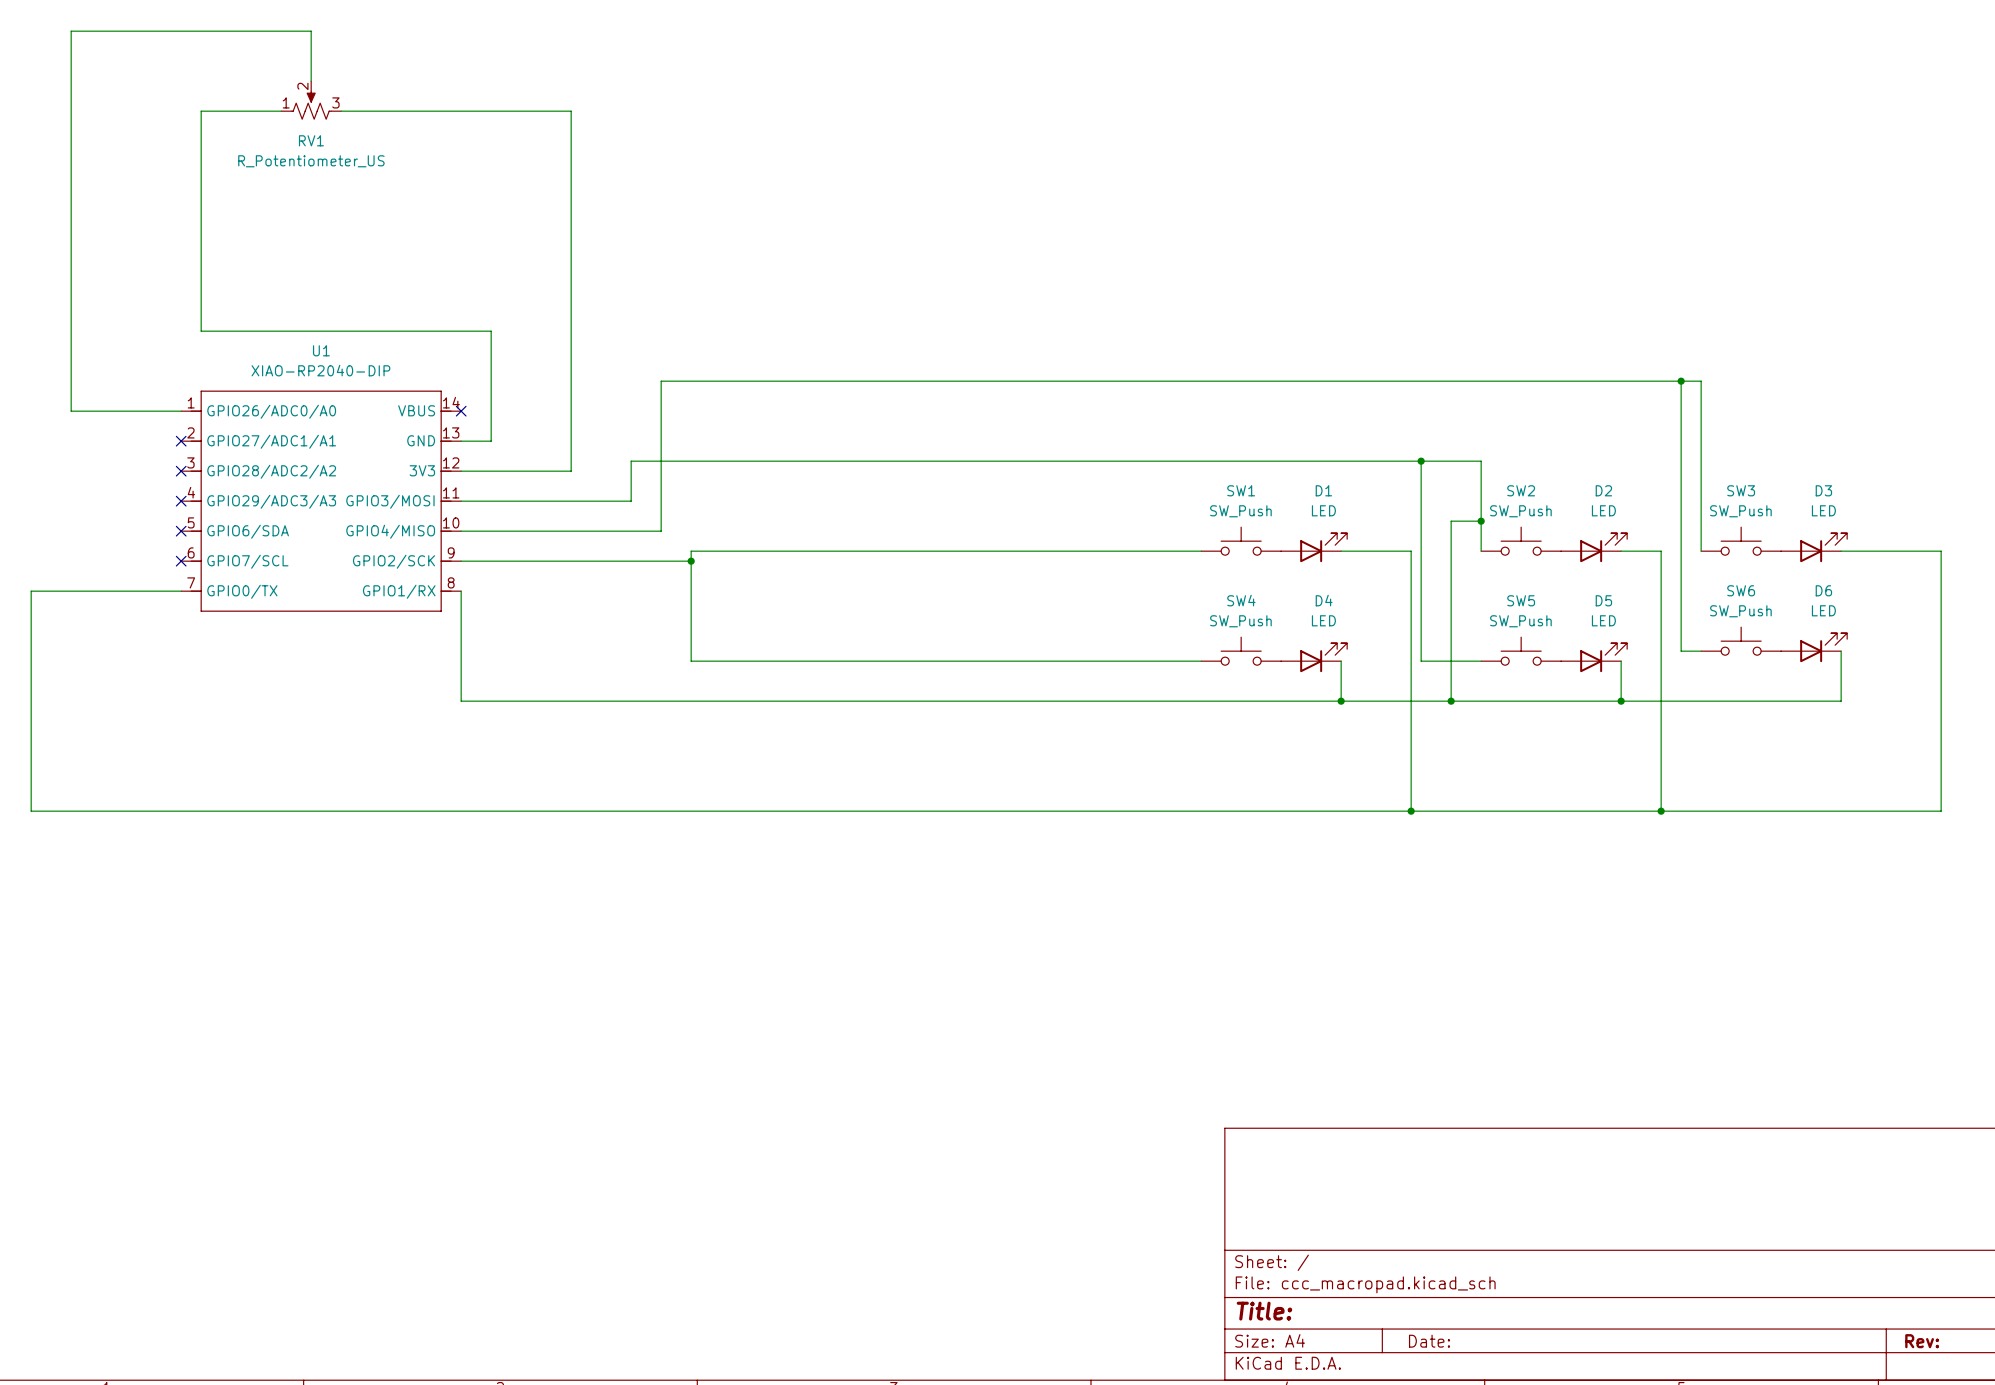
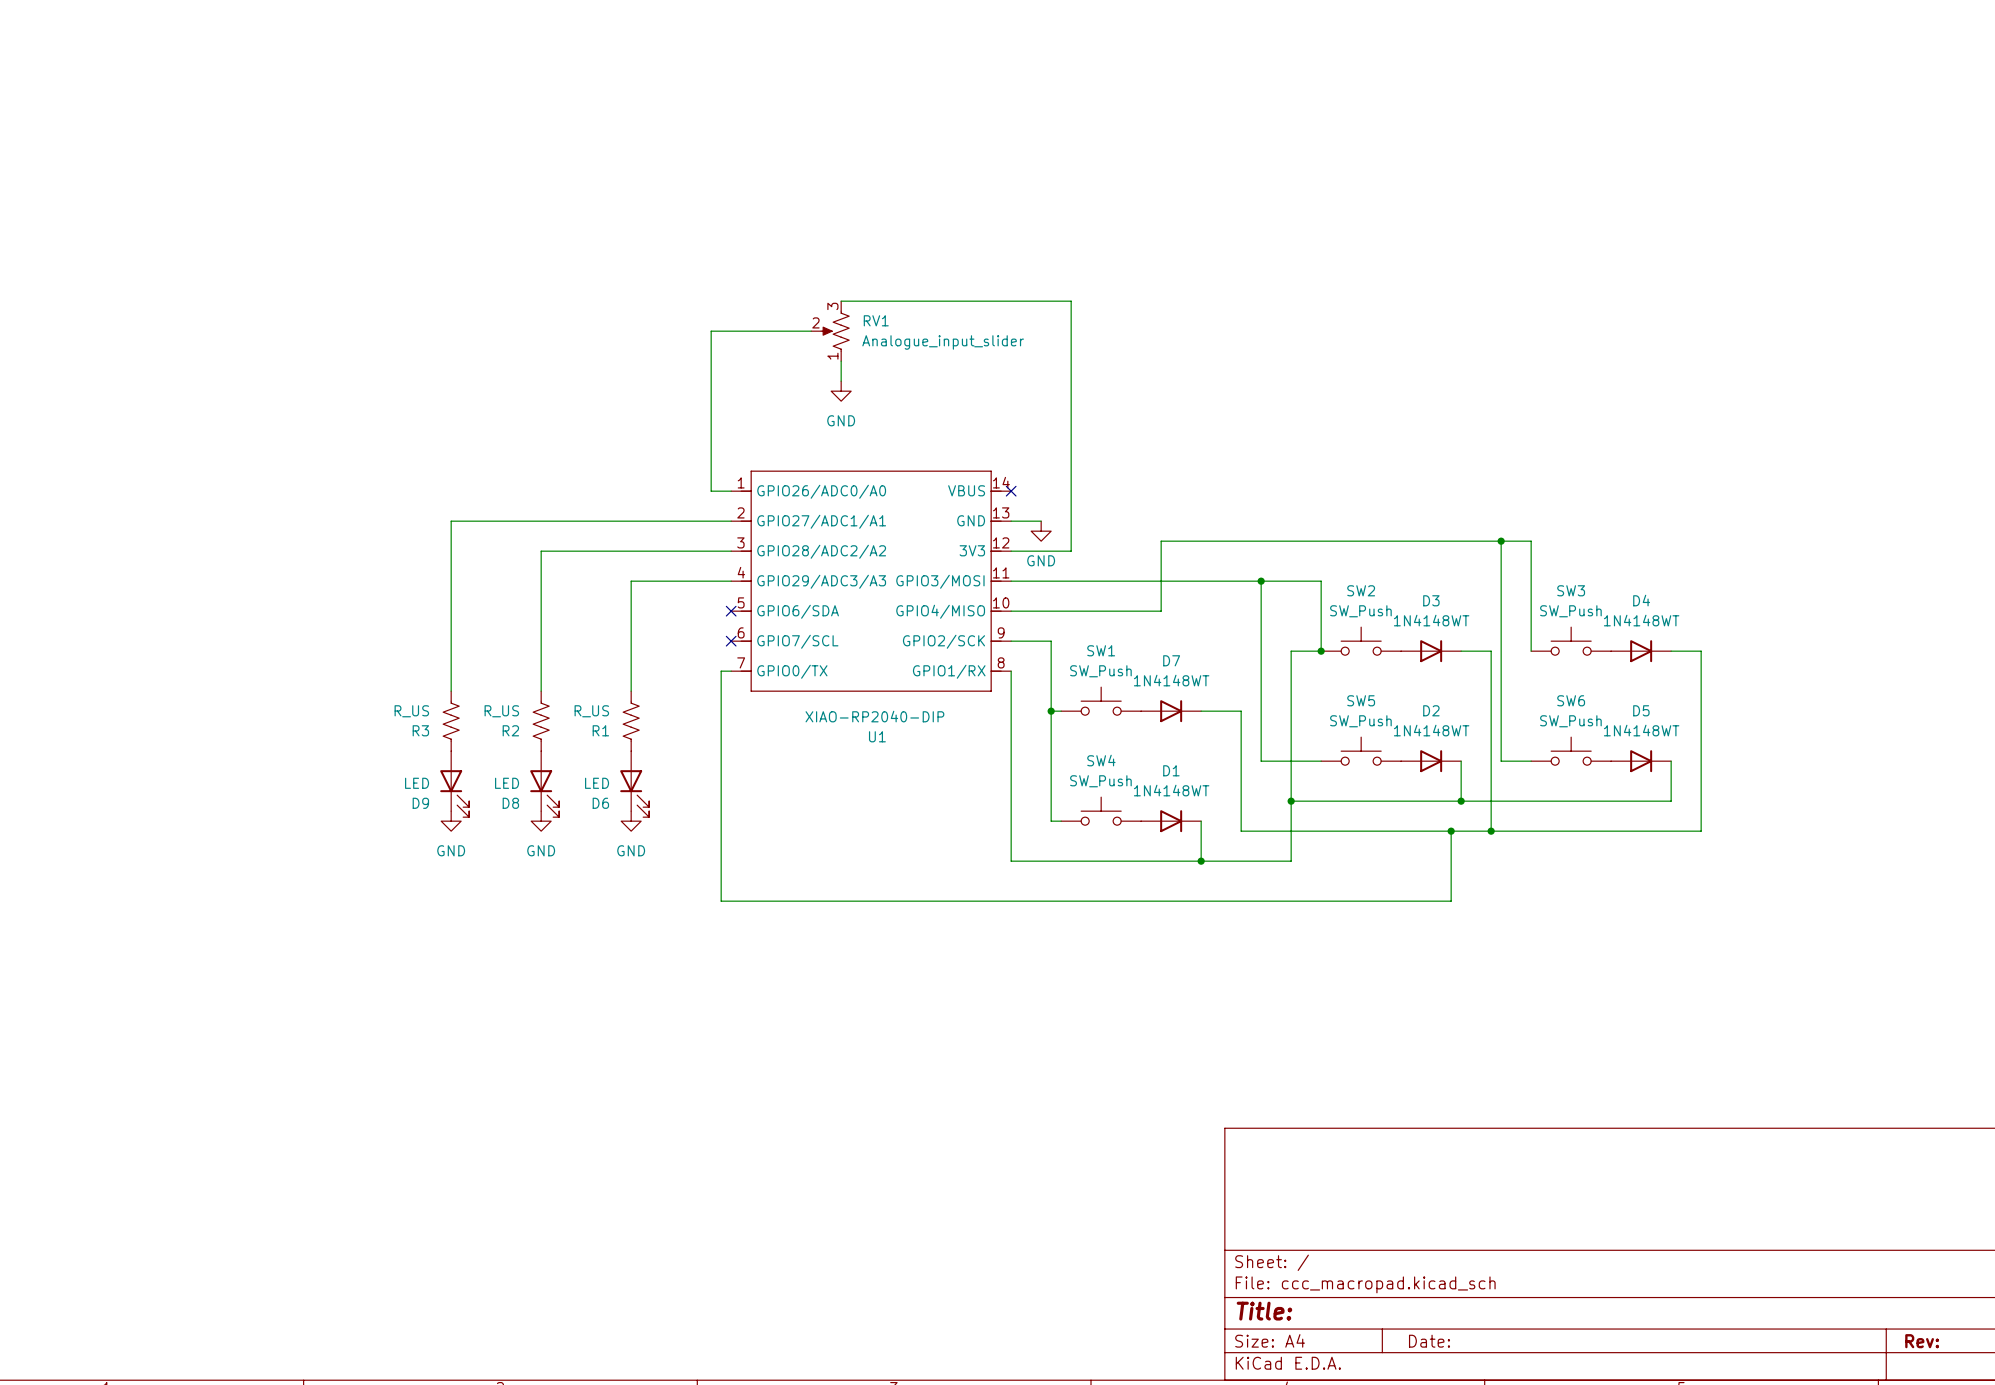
wire: (311, 81) (311, 31) (71, 31) (71, 411) (181, 411) -> none
RV1 position: (311, 100) -> (830, 331)
RV1 rotation: 0° (311, 105) -> 90° counterclockwise (835, 331)
wire: (281, 111) (201, 111) (201, 331) (491, 331) (491, 441) (461, 441) -> none
wire: (341, 111) (571, 111) (571, 471) (461, 471) -> none
RV1 value: R_Potentiometer_US (311, 161) -> Analogue_input_slider (943, 342)
wire: none -> (811, 331) (711, 331) (711, 491) (731, 491)
U1 name position: U1 (321, 350) -> U1 (877, 736)
wire: none -> (841, 361) (841, 381)
U1 value position: XIAO-RP2040-DIP (320, 370) -> XIAO-RP2040-DIP (874, 716)
wire: (1681, 381) (1681, 651) -> (1671, 651) (1681, 651)
junction: (1681, 381) -> none
power symbol: none -> GND (841, 391)
no-connect mark: (461, 411) -> none
no-connect mark: (181, 441) -> none
wire: (1421, 461) (1421, 661) (1481, 661) -> none
junction: (1421, 461) -> none
no-connect mark: (181, 471) -> none
no-connect mark: none -> (1011, 491)
no-connect mark: (181, 501) -> none
U1 position: (321, 501) -> (871, 581)
wire: (461, 501) (631, 501) (631, 461) (1481, 461) (1481, 551) -> none
D1 value: LED (1323, 510) -> 1N4148WT (1171, 790)
D2 value: LED (1603, 510) -> 1N4148WT (1431, 730)
D3 value: LED (1823, 510) -> 1N4148WT (1431, 620)
wire: none -> (731, 521) (451, 521) (451, 691)
wire: none -> (1011, 521) (1041, 521)
wire: (1481, 521) (1451, 521) (1451, 701) -> none
junction position: (1481, 521) -> (1501, 541)
no-connect mark: (181, 531) -> none
wire: (461, 531) (661, 531) (661, 381) (1701, 381) (1701, 551) -> none
power symbol: none -> GND (1041, 531)
D1 symbol: [1281, 533, 1348, 563] -> [1141, 810, 1202, 833]
D2 symbol: [1561, 533, 1628, 563] -> [1401, 750, 1462, 773]
D3 symbol: [1781, 533, 1848, 563] -> [1401, 640, 1462, 663]
SW1 position: (1241, 541) -> (1101, 701)
wire: none -> (1501, 541) (1501, 761) (1531, 761)
SW2 position: (1521, 541) -> (1361, 641)
SW3 position: (1741, 541) -> (1571, 641)
wire: (691, 551) (691, 661) (1201, 661) -> (691, 551) (541, 551) (541, 691)
wire: (731, 551) (1011, 551) -> none
wire: (1071, 551) (1201, 551) -> (1071, 551) (1071, 301) (841, 301)
wire: (1341, 551) (1411, 551) (1411, 811) -> none
wire: (1621, 551) (1661, 551) (1661, 811) -> none
wire: (1841, 551) (1941, 551) (1941, 811) (31, 811) (31, 591) (181, 591) -> none
no-connect mark: (181, 561) -> none
wire: (461, 561) (691, 561) -> none
junction: (691, 561) -> none
wire: none -> (731, 581) (631, 581) (631, 691)
wire: none -> (1011, 581) (1321, 581) (1321, 651) (1291, 651) (1291, 861) (1011, 861) (1011, 671)
wire: none -> (1261, 581) (1261, 761) (1321, 761)
junction: none -> (1261, 581)
D6 name position: D6 (1823, 590) -> D6 (600, 803)
wire: (461, 591) (461, 701) (1841, 701) (1841, 651) -> none
D6 value position: LED (1823, 610) -> LED (597, 783)
no-connect mark: none -> (731, 611)
wire: none -> (1011, 611) (1161, 611) (1161, 541) (1531, 541) (1531, 651)
D4 value: LED (1323, 620) -> 1N4148WT (1641, 620)
D5 value: LED (1603, 620) -> 1N4148WT (1641, 730)
no-connect mark: none -> (731, 641)
wire: none -> (1011, 641) (1051, 641) (1051, 821) (1061, 821)
SW6 position: (1741, 641) -> (1571, 751)
D4 symbol: [1281, 643, 1348, 673] -> [1611, 640, 1672, 663]
D5 symbol: [1561, 643, 1628, 673] -> [1611, 750, 1672, 773]
D6 position: (1814, 647) -> (634, 784)
D6 rotation: 0° (1823, 647) -> 90° clockwise (634, 793)
SW4 position: (1241, 651) -> (1101, 811)
junction: none -> (1321, 651)
wire: none -> (1461, 651) (1491, 651) (1491, 831)
SW5 position: (1521, 651) -> (1361, 751)
wire: none -> (1701, 651) (1701, 831) (1241, 831) (1241, 711) (1201, 711)
wire: (1341, 661) (1341, 701) -> (1461, 761) (1461, 801)
wire: (1621, 661) (1621, 701) -> none
wire: none -> (731, 671) (721, 671) (721, 901) (1451, 901) (1451, 831)
junction: (1341, 701) -> none
junction: (1451, 701) -> none
junction: (1621, 701) -> none
wire: none -> (1051, 711) (1061, 711)
junction: none -> (1051, 711)
D7: none -> 1N4148WT (1171, 711)
R3: none -> R_US (451, 721)
R2: none -> R_US (541, 721)
R1: none -> R_US (631, 721)
wire: none -> (1671, 761) (1671, 801) (1291, 801)
D9: none -> LED (454, 784)
D8: none -> LED (544, 784)
junction: none -> (1291, 801)
junction: none -> (1461, 801)
junction: (1411, 811) -> none
junction: (1661, 811) -> none
power symbol: none -> GND (451, 821)
power symbol: none -> GND (541, 821)
power symbol: none -> GND (631, 821)
wire: none -> (1201, 821) (1201, 861)
junction: none -> (1451, 831)
junction: none -> (1491, 831)
junction: none -> (1201, 861)

